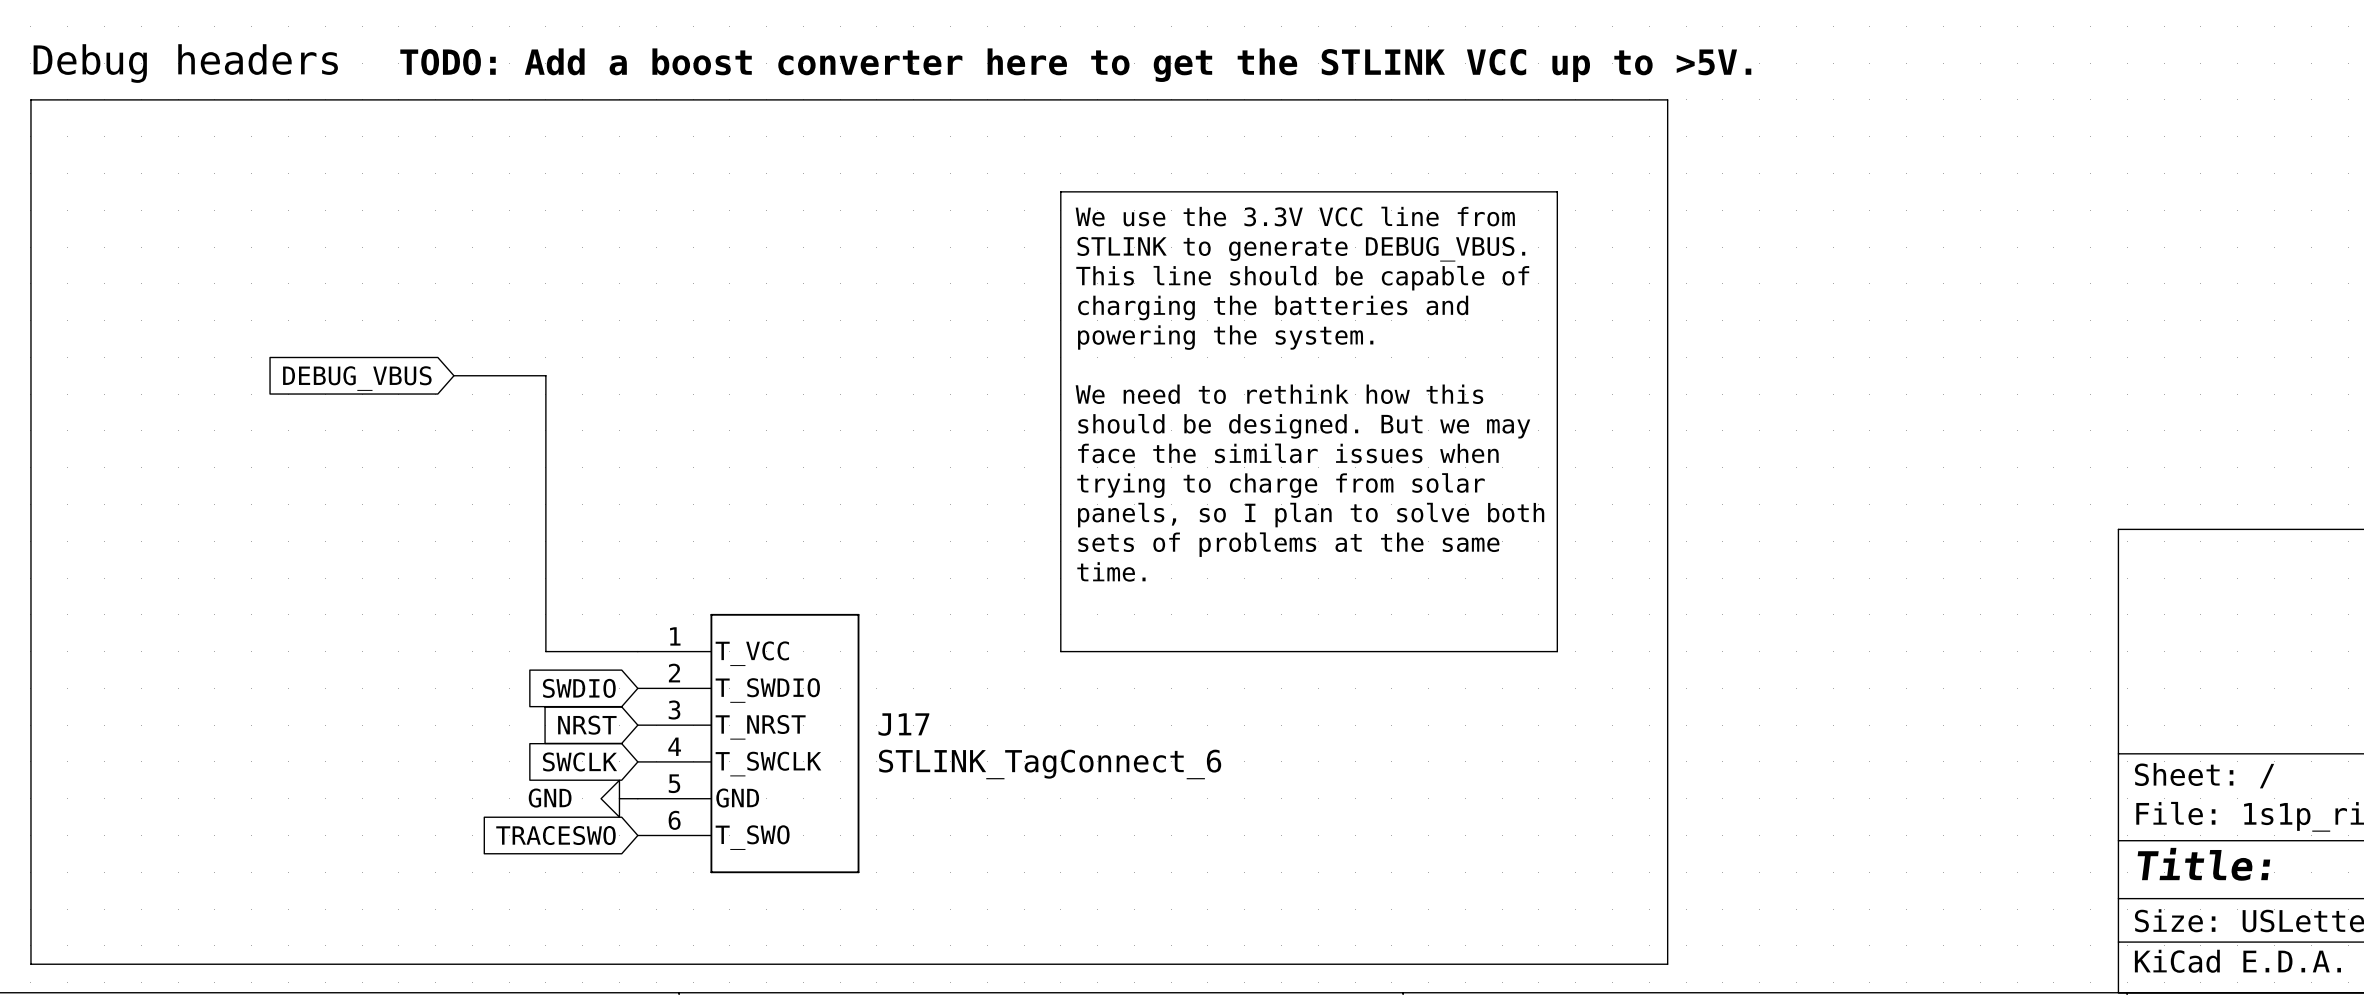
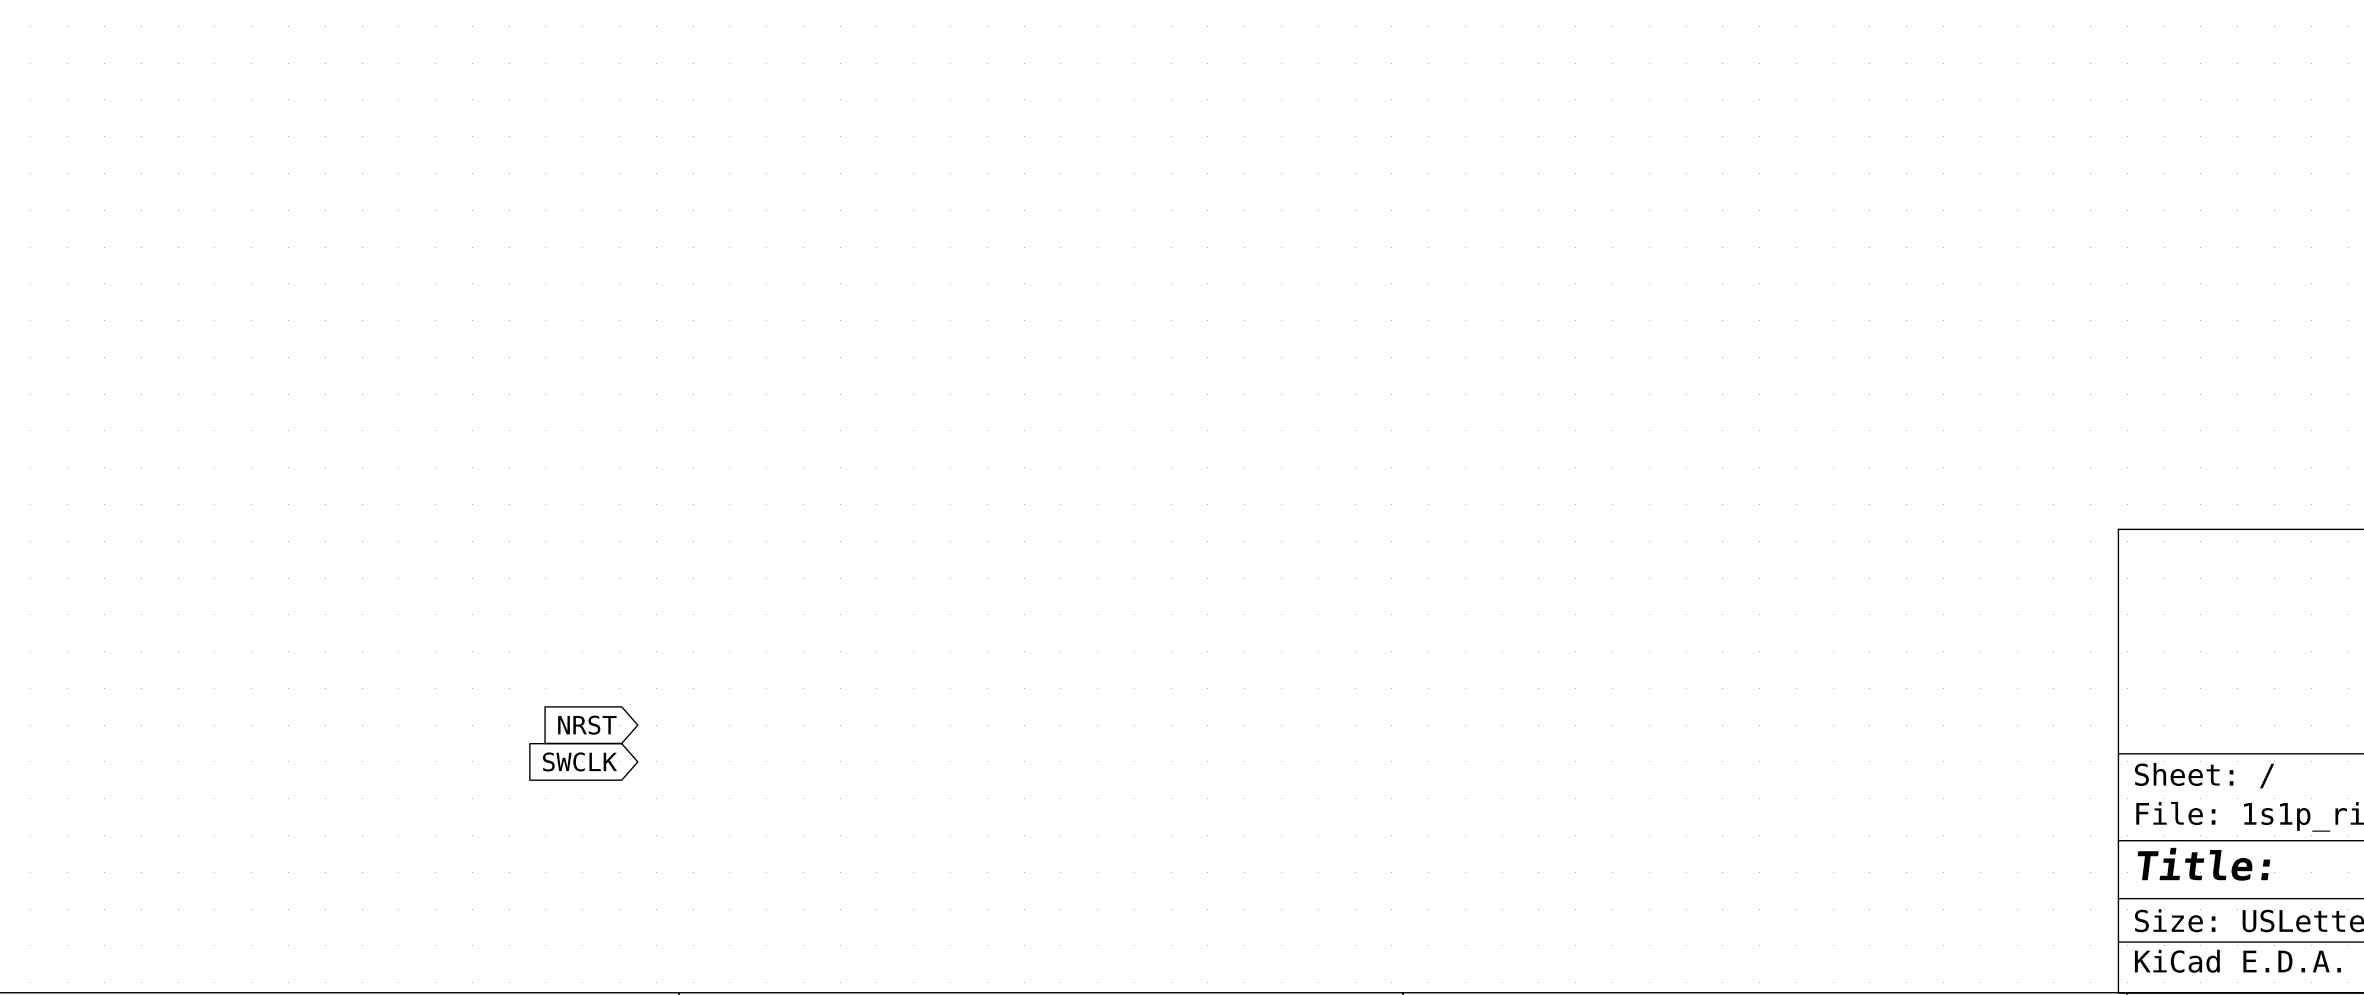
text: Debug headers (185, 63) -> none
text: TODO: Add a boost converter here to get the STLINK VCC up to >5V. (1075, 65) -> none
line: (30, 99) (1667, 99) (1667, 964) (30, 964) (30, 99) -> none
line: (1060, 191) (1557, 191) (1557, 651) (1060, 651) (1060, 191) -> none
text: We use the 3.3V VCC line from (1295, 216) -> none
text: STLINK to generate DEBUG_VBUS. (1301, 249) -> none
text: This line should be capable of (1302, 278) -> none
text: charging the batteries and (1273, 307) -> none
text: powering the system. (1225, 337) -> none
wire: (453, 375) (545, 375) (545, 651) (637, 651) -> none
global label: DEBUG_VBUS (357, 378) -> none
text: We need to rethink how this (1279, 394) -> none
text: should be designed. But we may (1304, 426) -> none
text: face the similar issues when (1288, 453) -> none
text: trying to charge from solar (1281, 485) -> none
text: panels, so I plan to solve both (1311, 515) -> none
text: sets of problems at the same (1288, 544) -> none
text: time. (1111, 571) -> none
global label: SWDIO (579, 688) -> none
J17: STLINK_TagConnect_6 (748, 743) -> none
power symbol: GND (619, 798) -> none
global label: TRACESWO (555, 835) -> none

